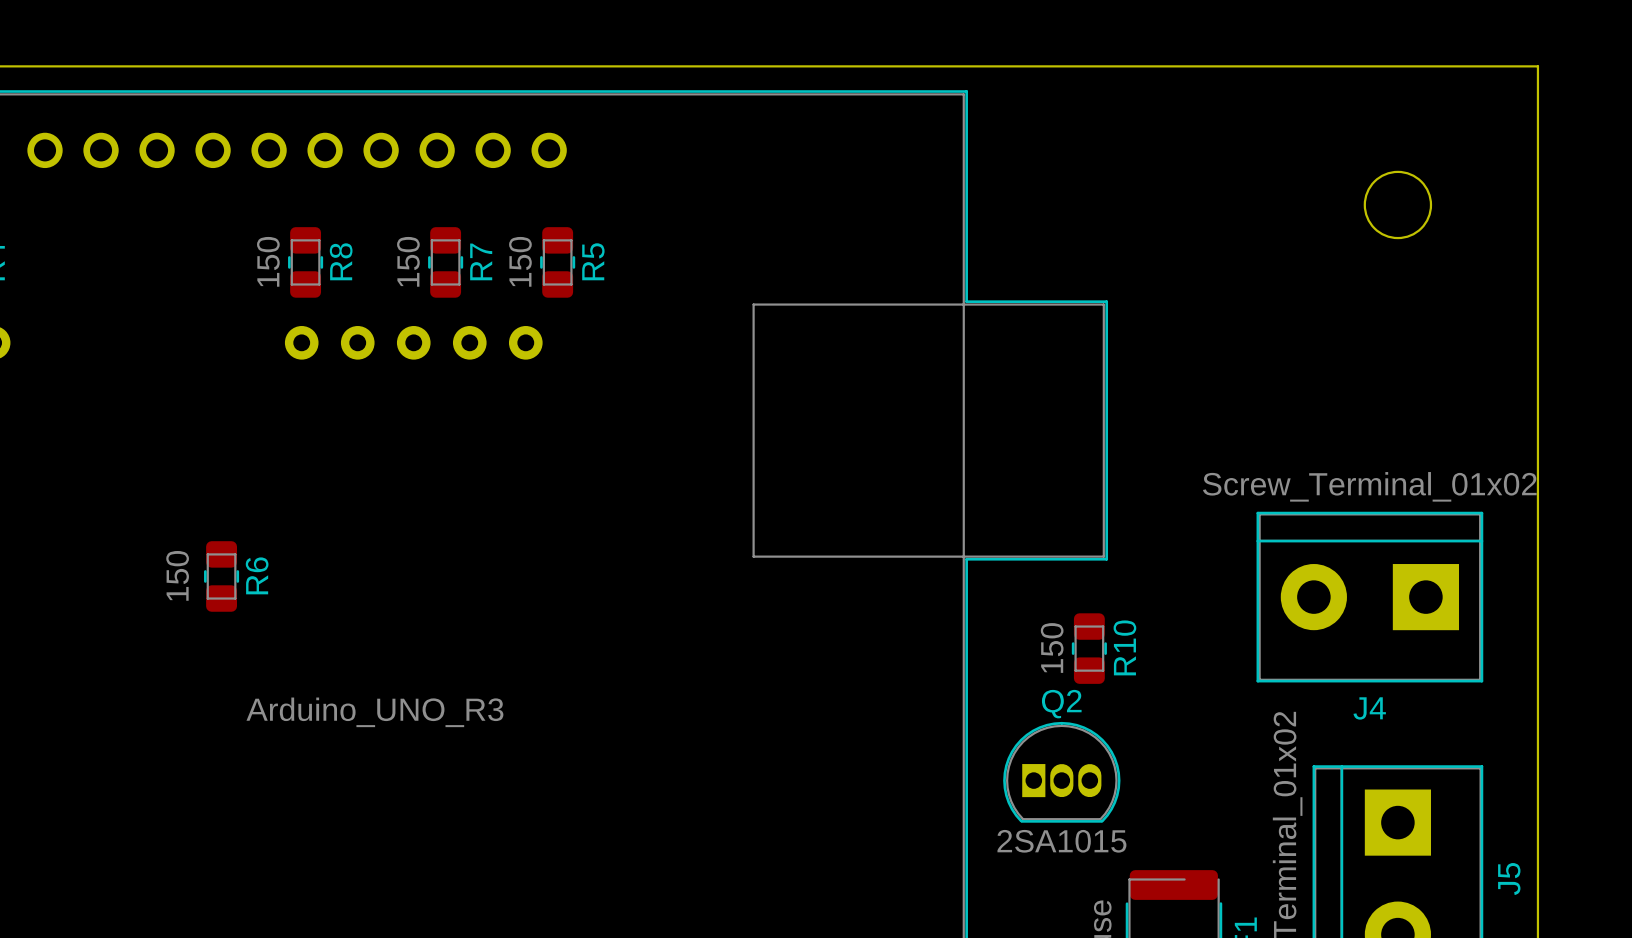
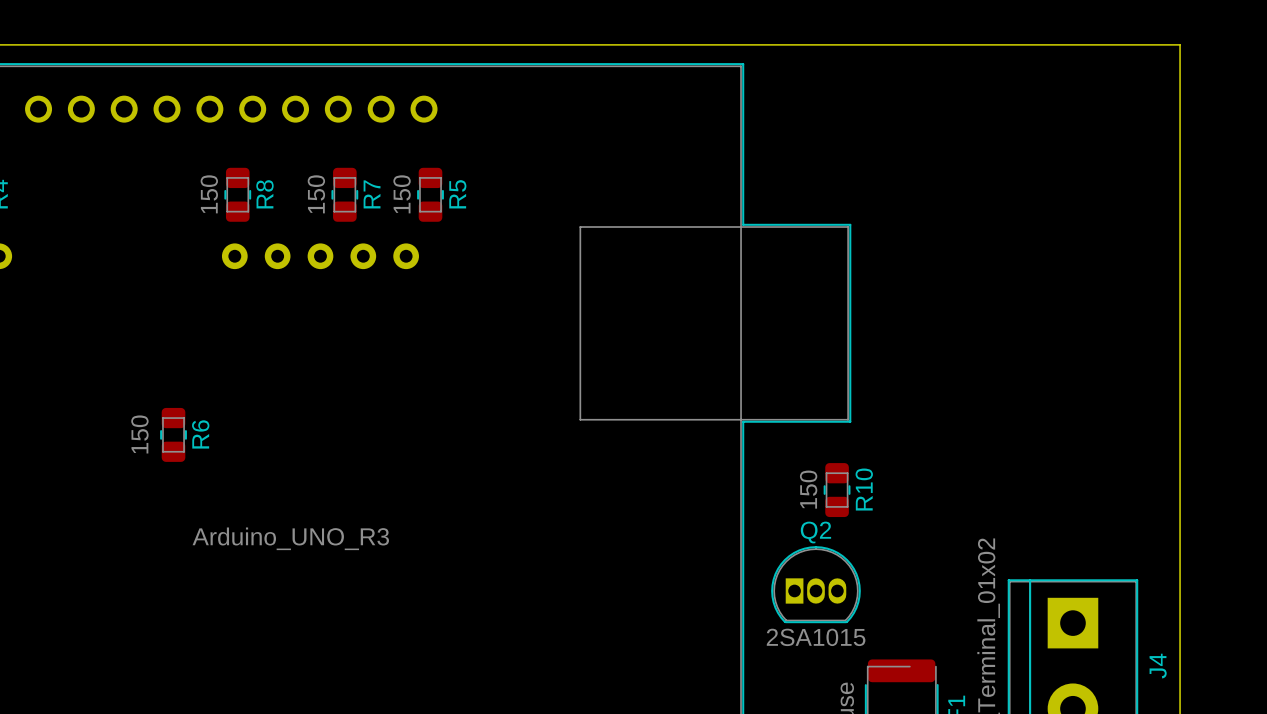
round board edge: [1363, 170, 1433, 240] -> none
J4: Screw_Terminal_01x02 (1369, 597) -> none
J5 name: J5 (1509, 879) -> J4 (1158, 666)

